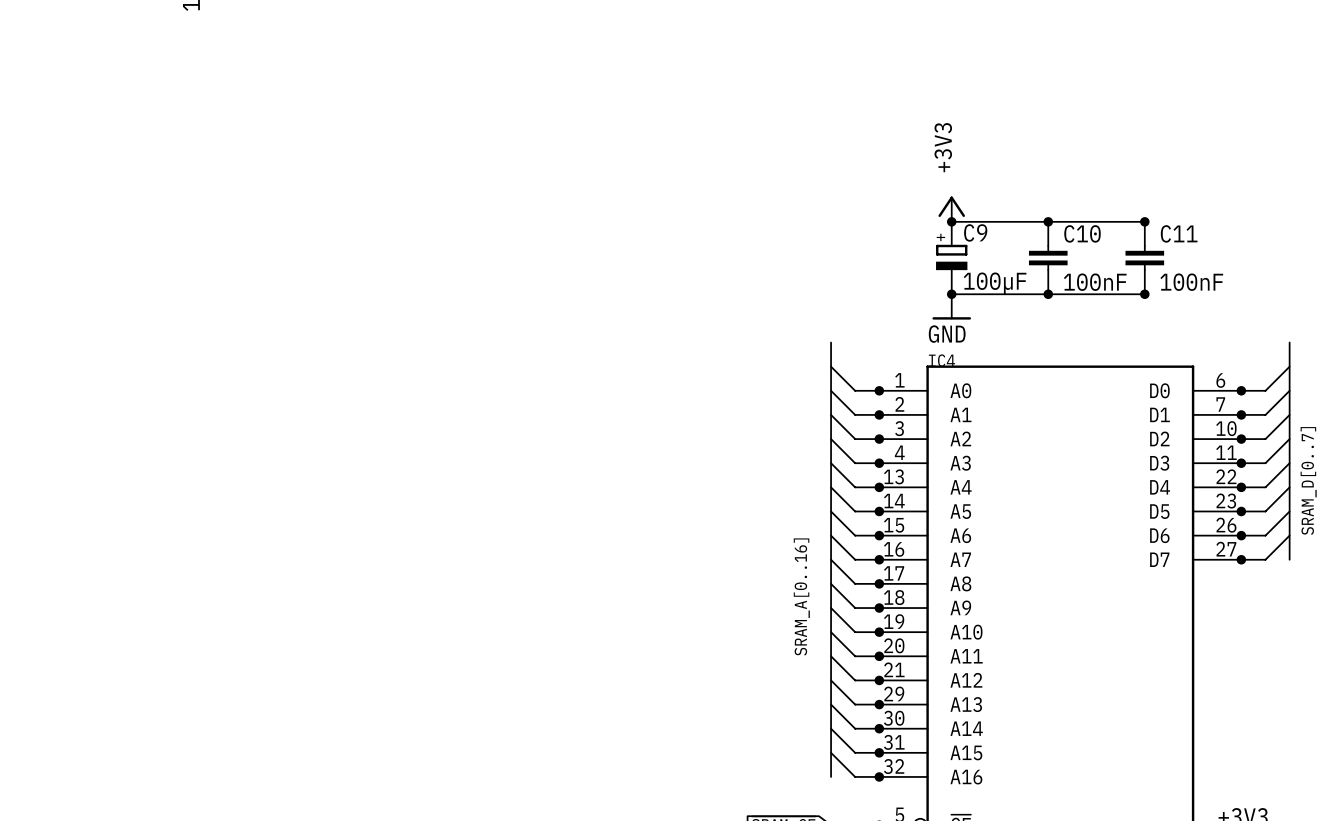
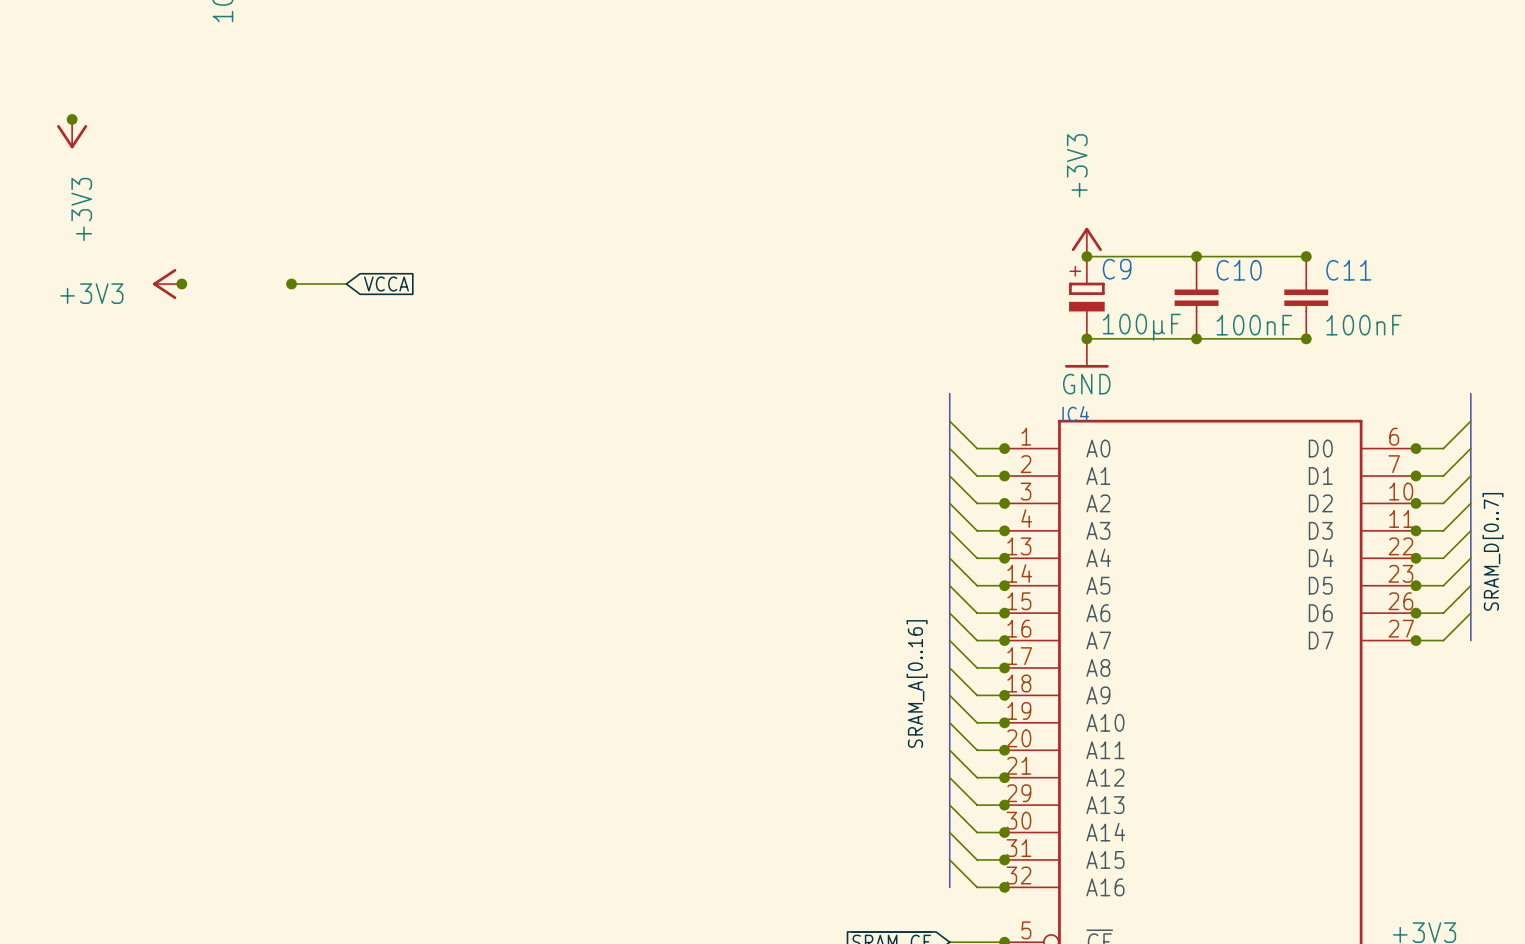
junction: none -> (72, 119)
power symbol: none -> +3V3 (72, 133)
power symbol: none -> +3V3 (167, 284)
junction: none -> (181, 284)
wire: none -> (291, 284) (346, 284)
junction: none -> (291, 284)
global label: none -> VCCA (386, 284)

